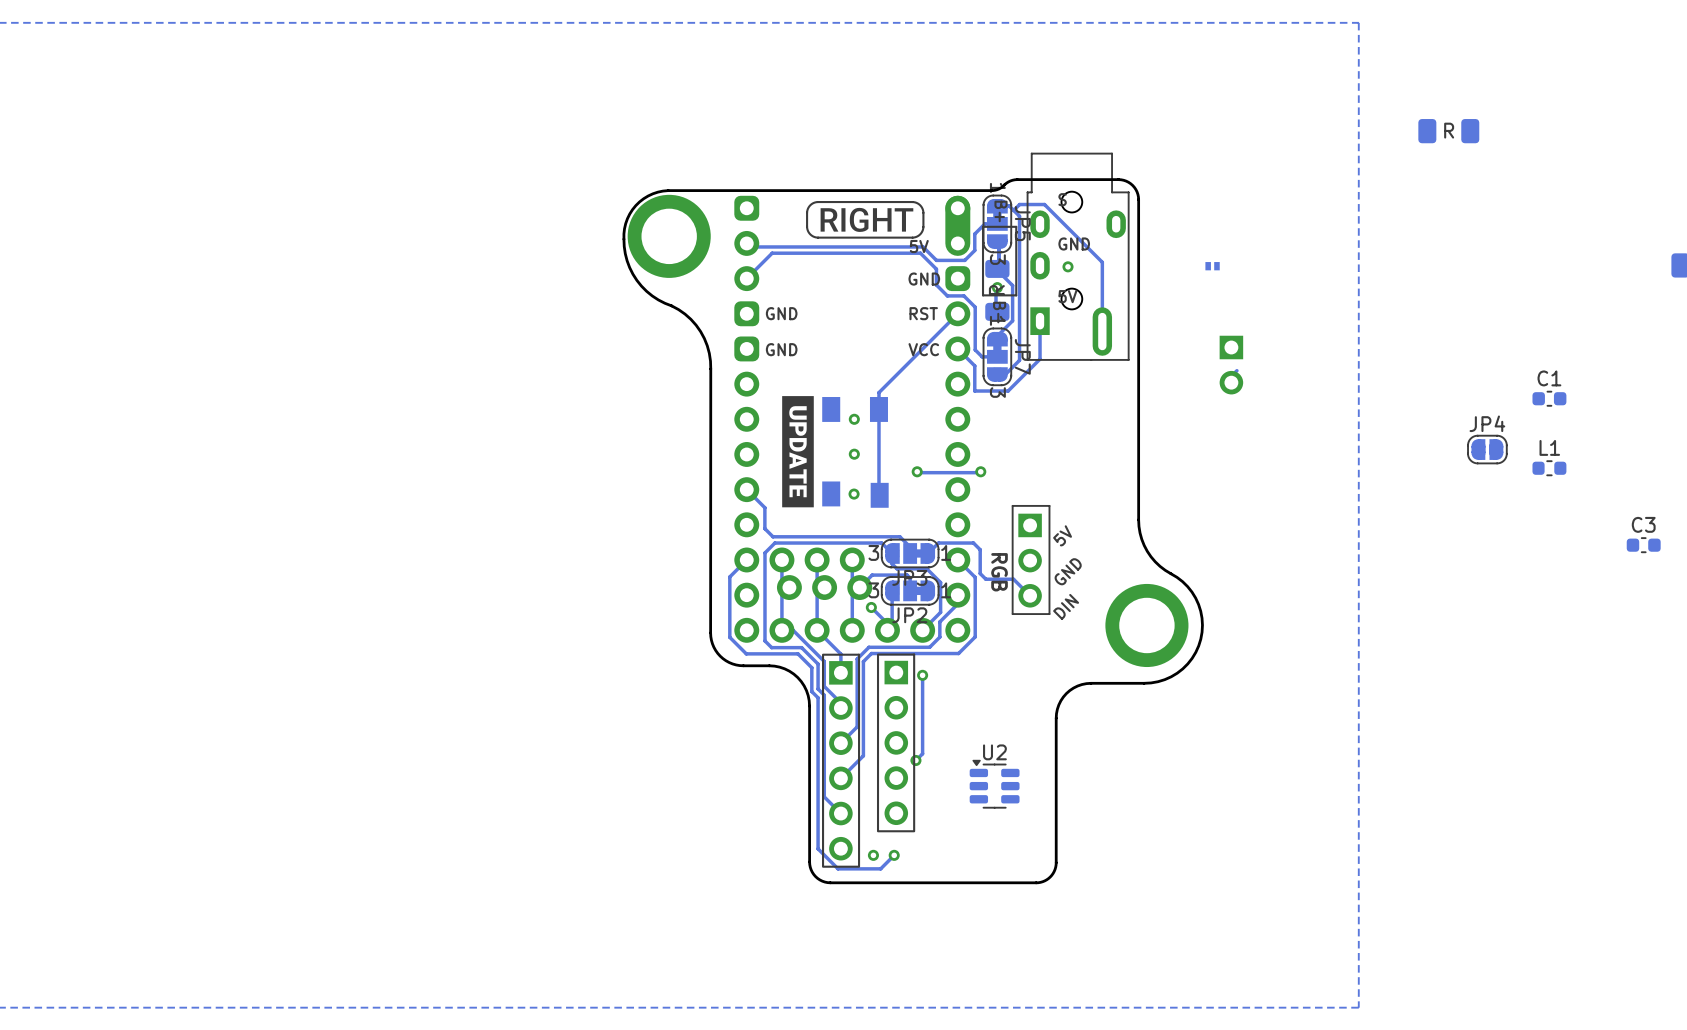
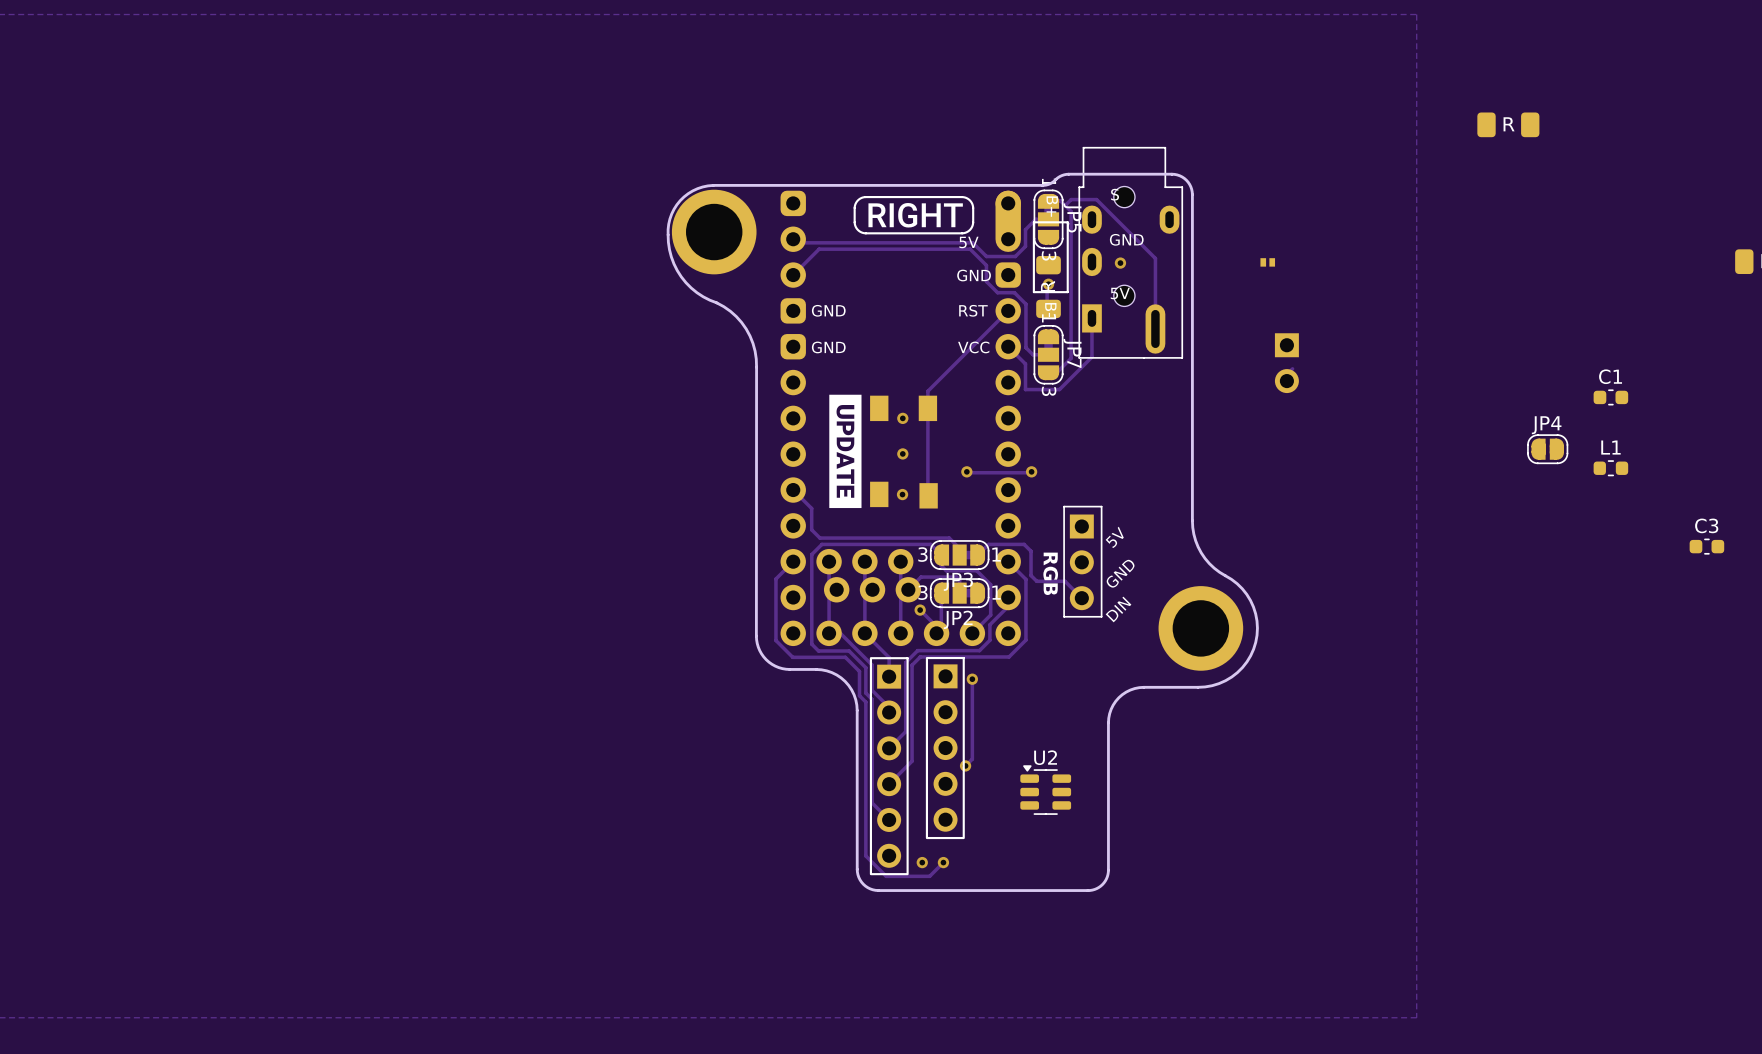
track: (998, 241) (998, 266) (995, 268) (1012, 285) (1012, 320) (994, 338) -> none

